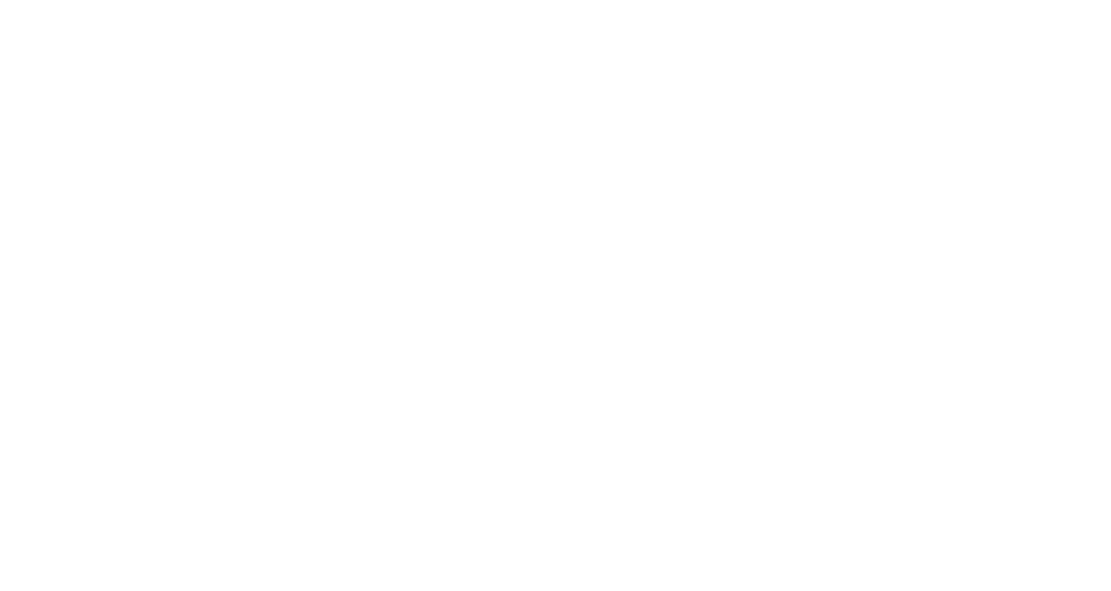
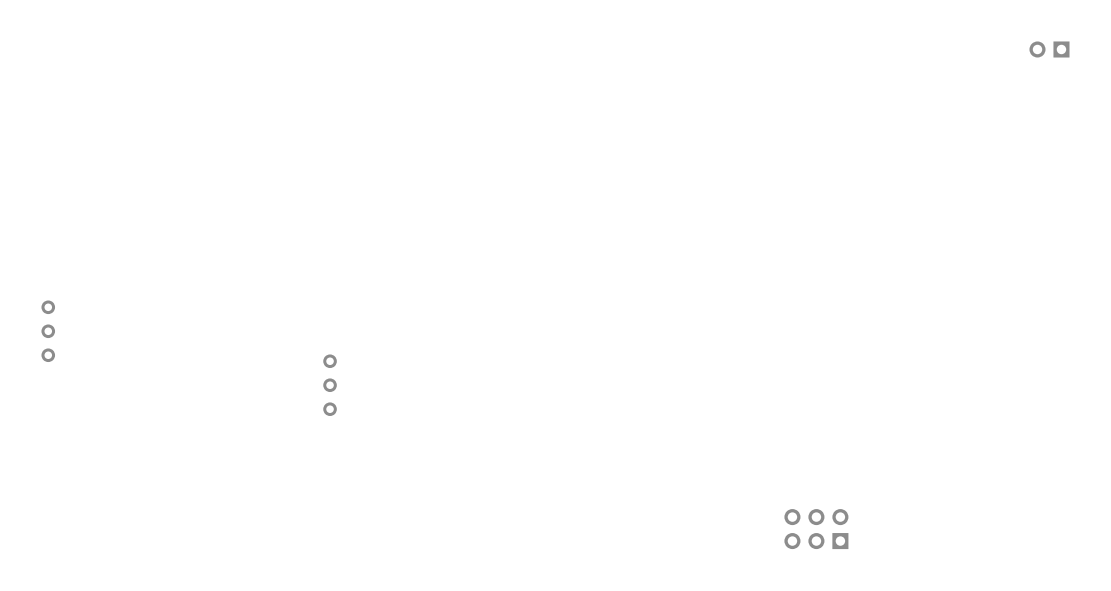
part: none -> (1049, 49)
part: none -> (48, 331)
part: none -> (330, 385)
part: none -> (816, 529)

